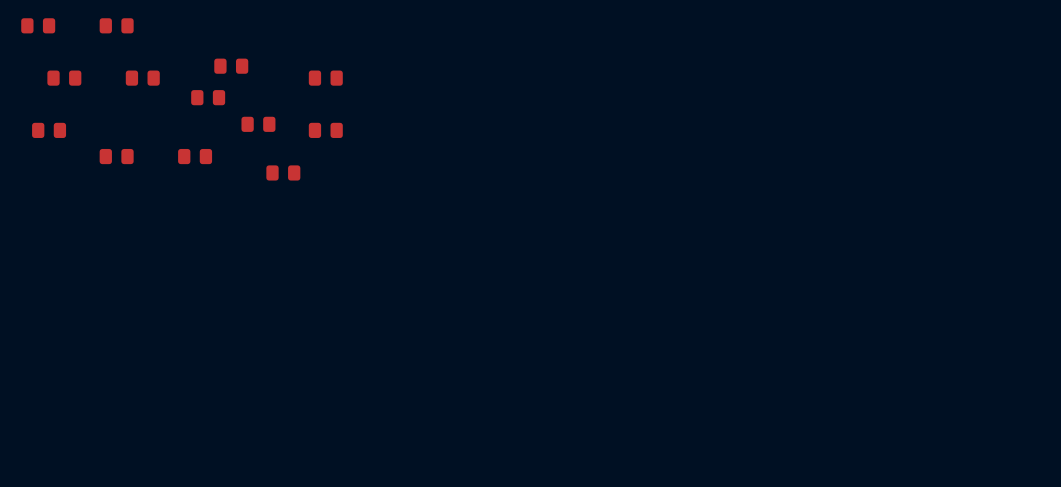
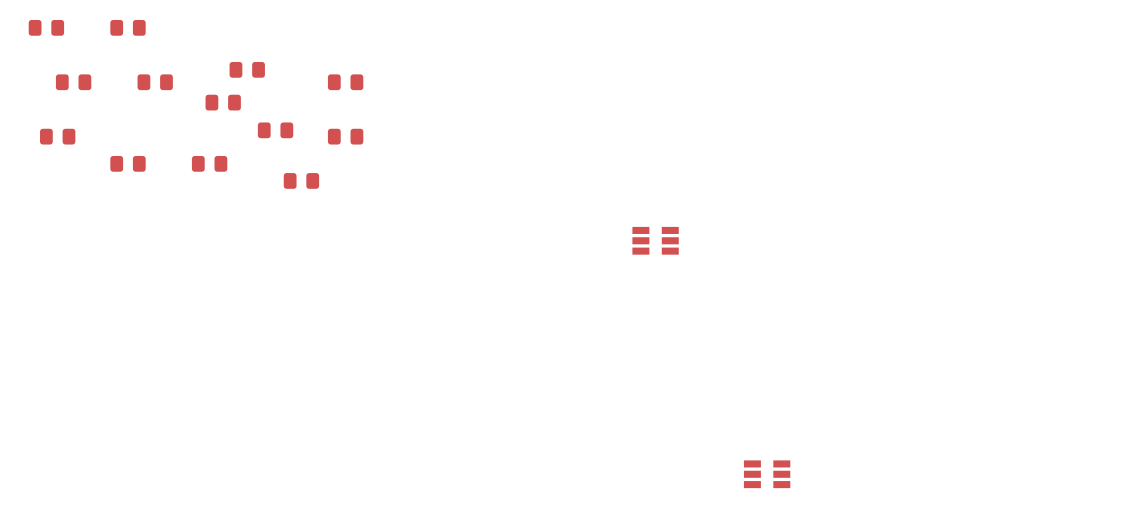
part: none -> (655, 240)
part: none -> (767, 474)

